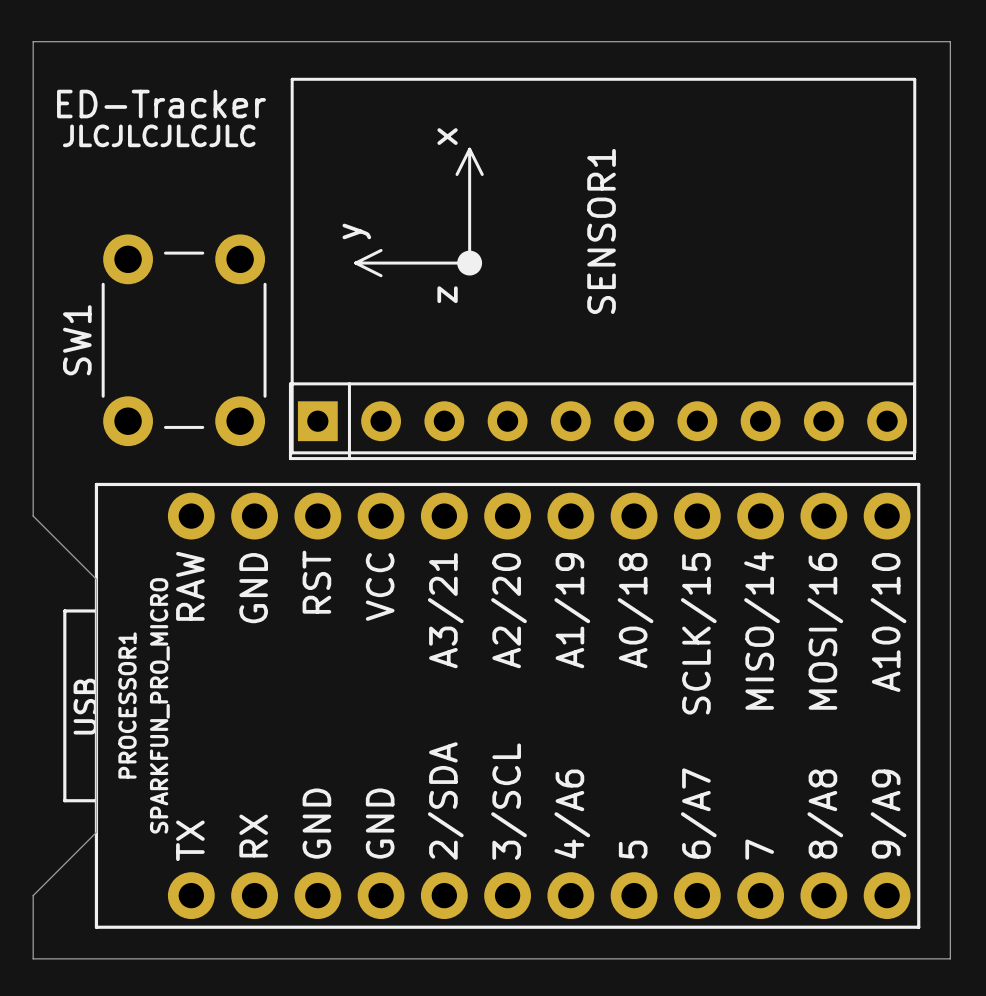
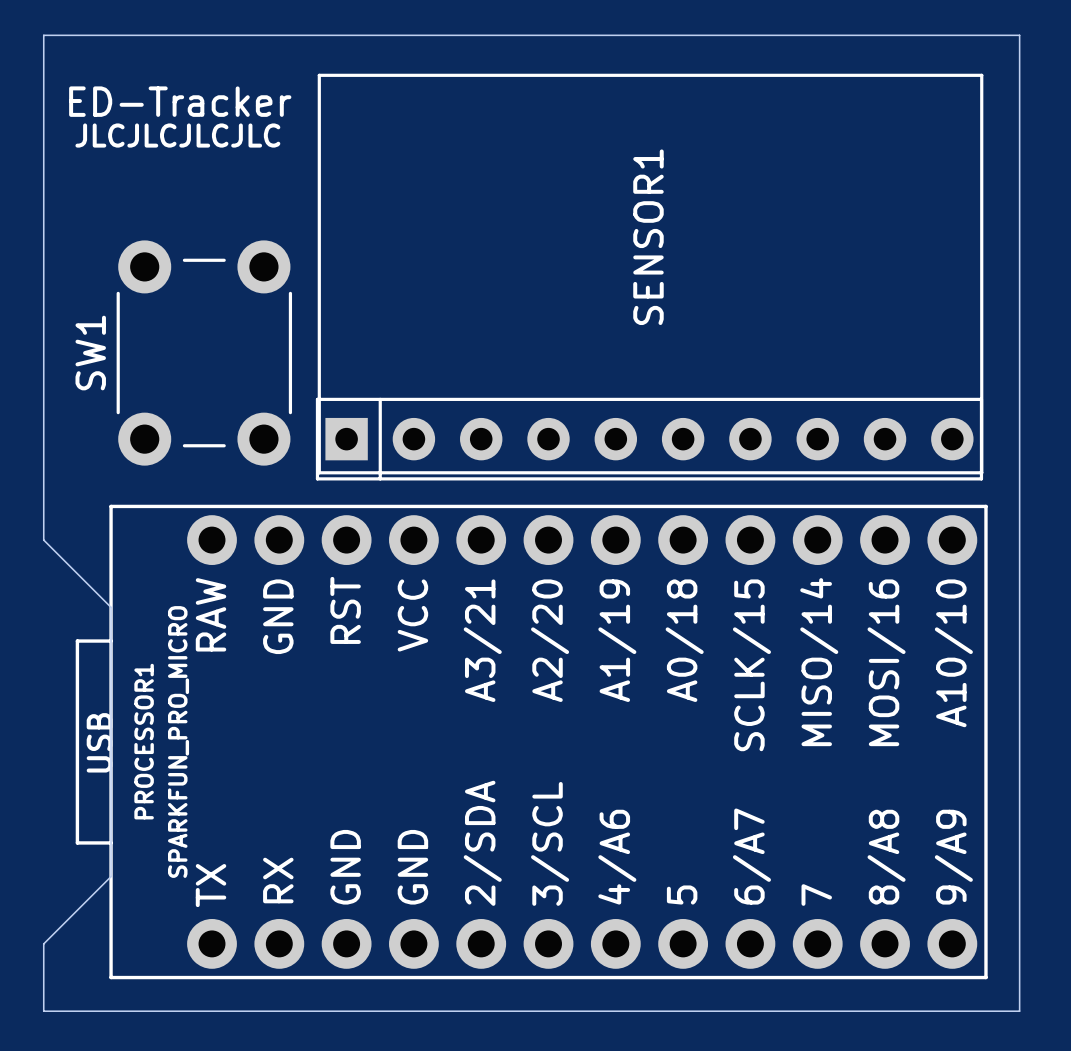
SENSOR1 footprint: [288, 77, 917, 461] -> [315, 73, 984, 481]

